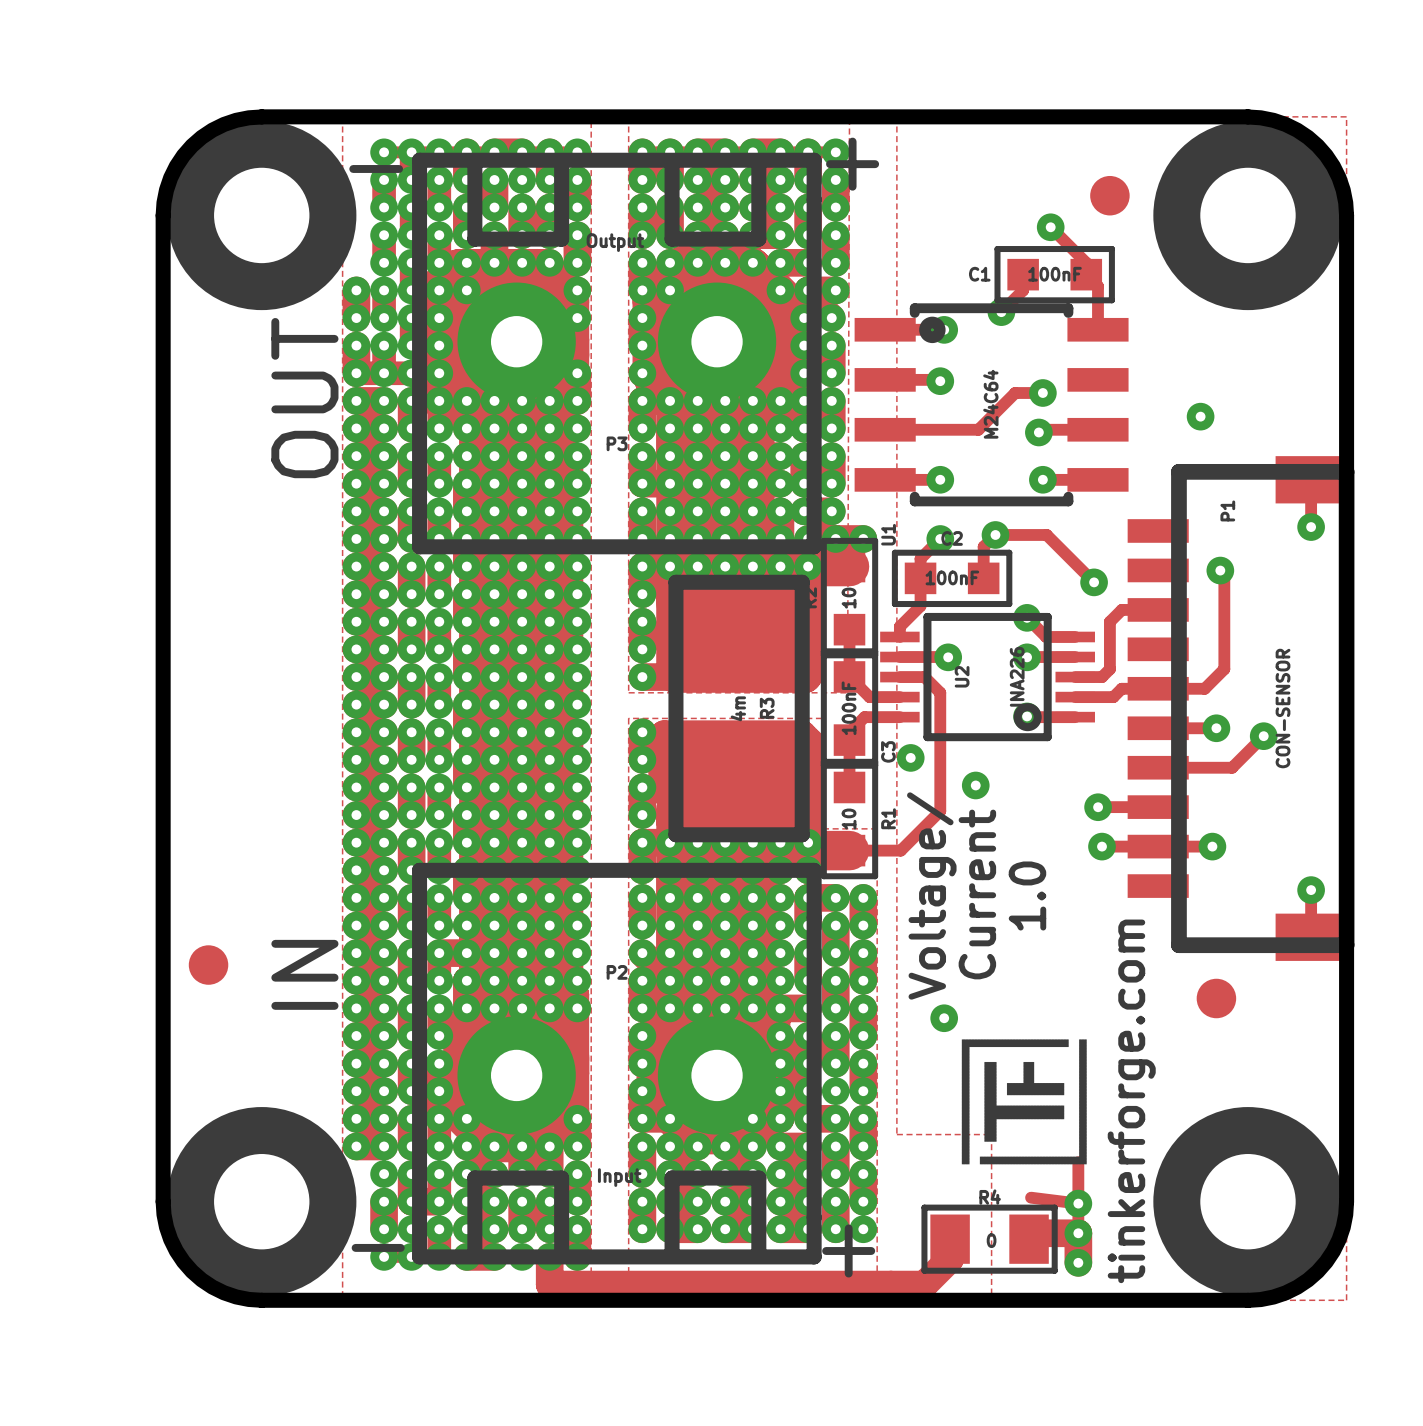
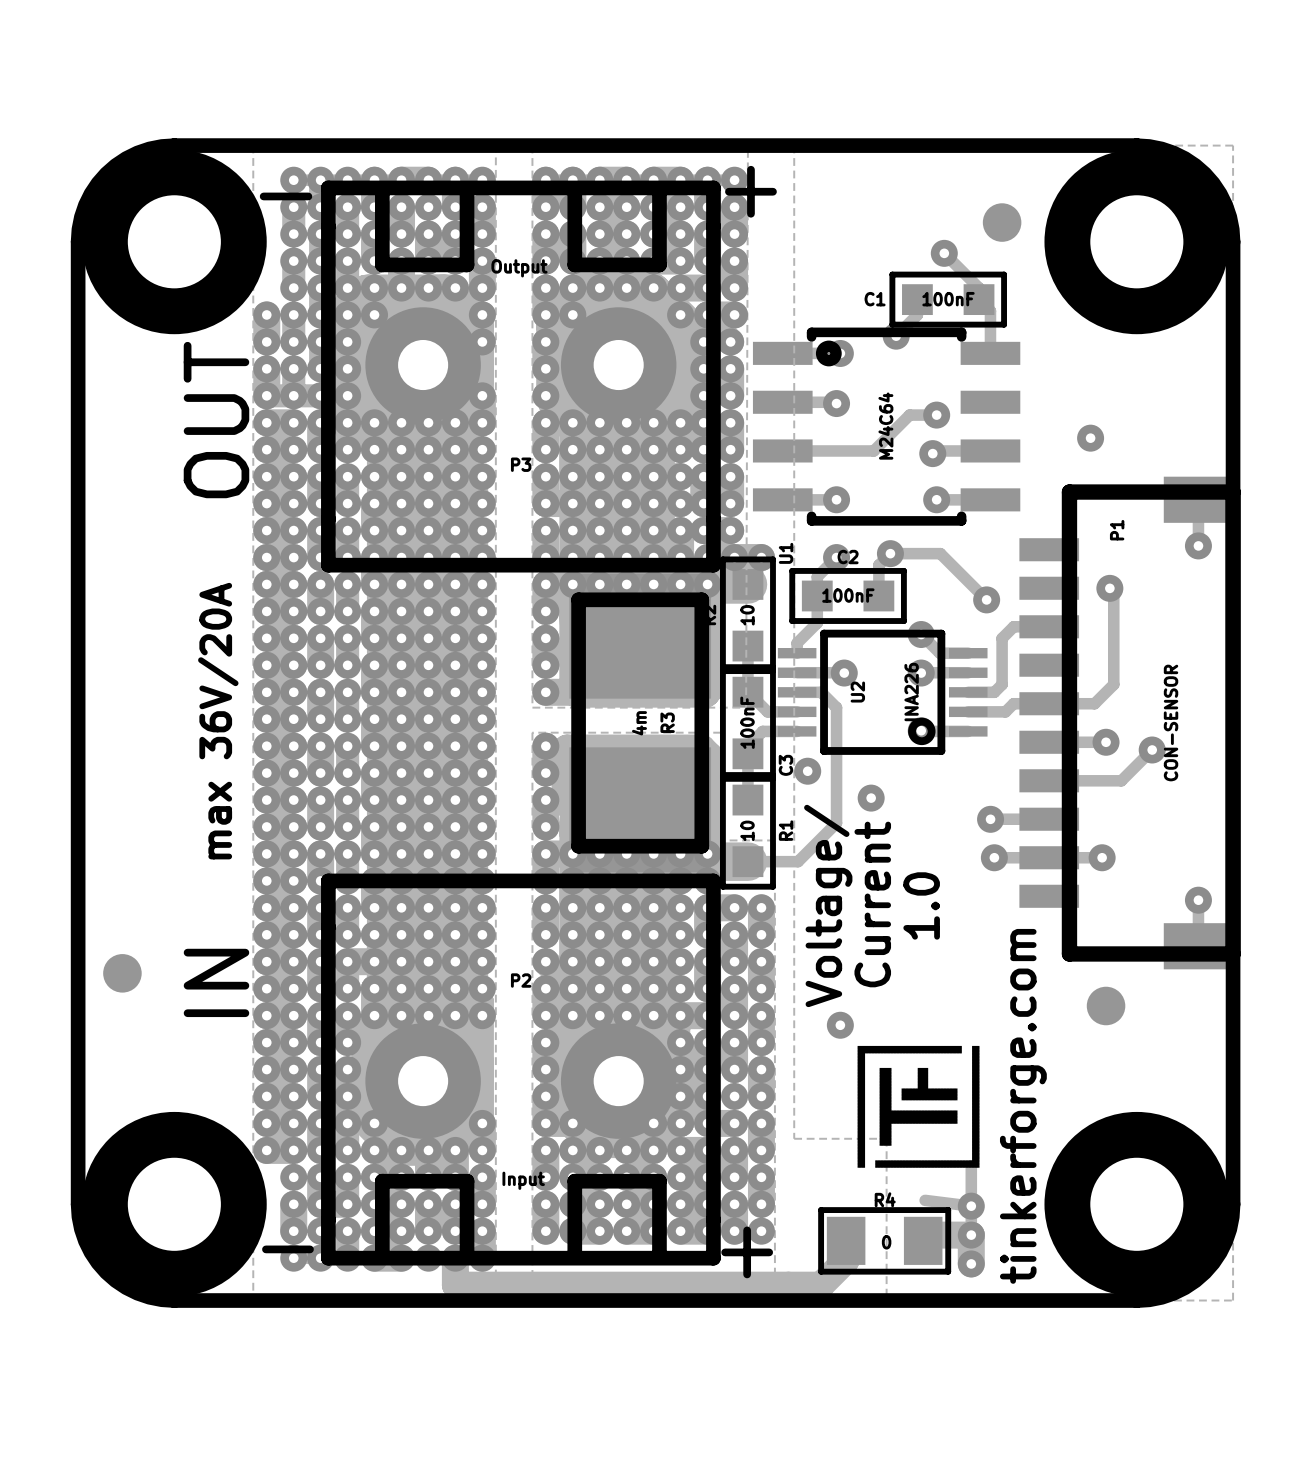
text: none -> max 36V/20A (218, 721)

